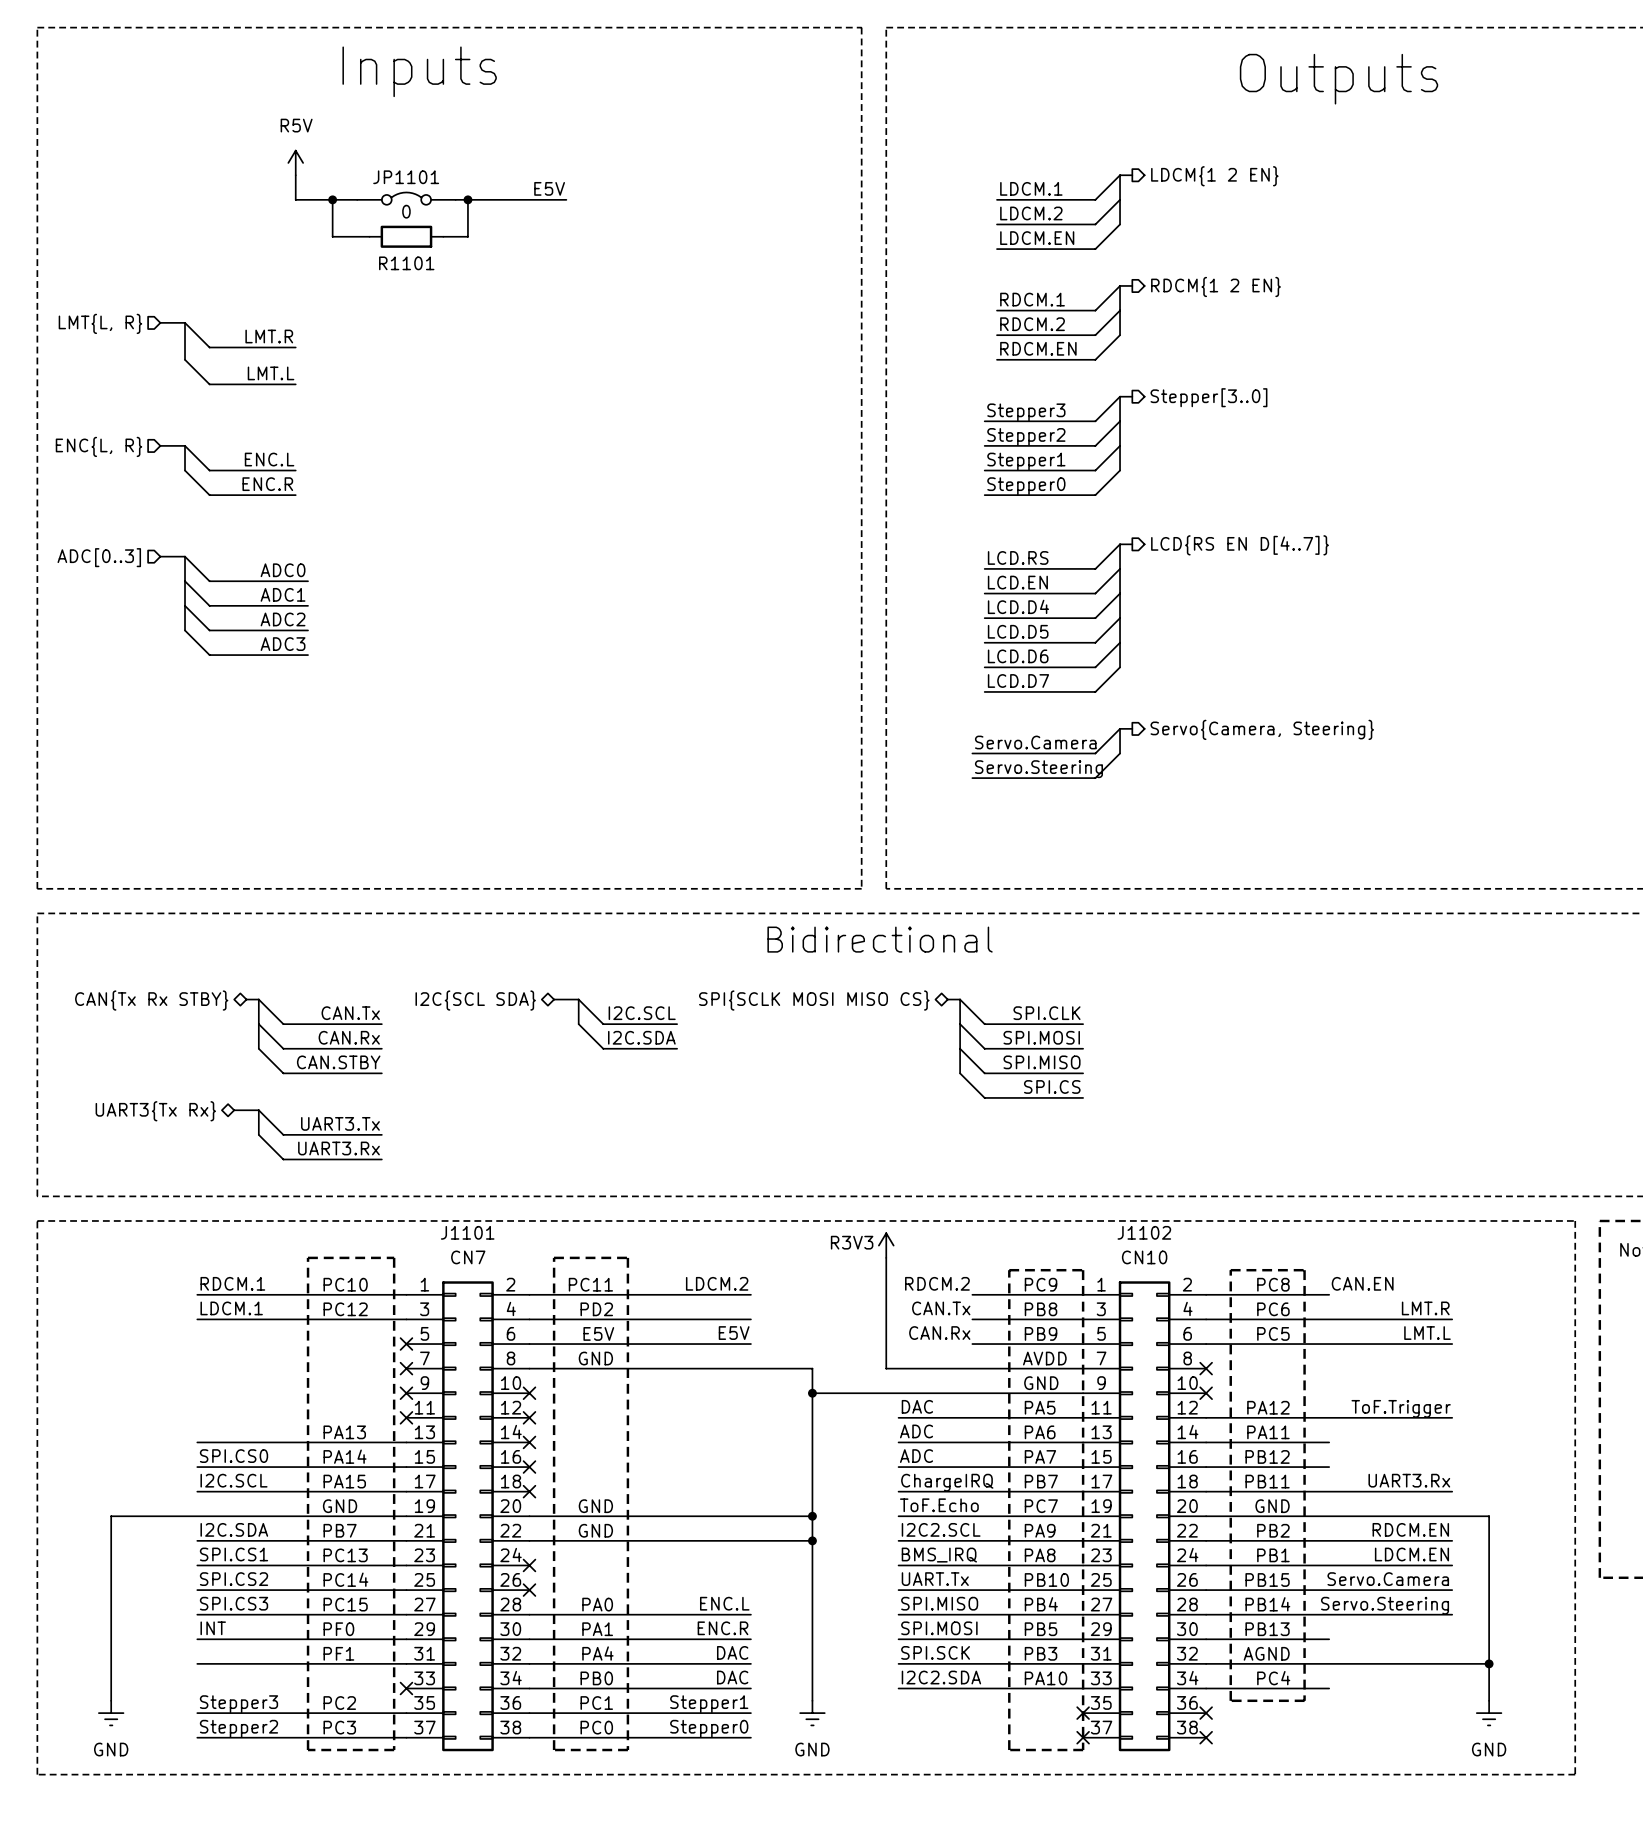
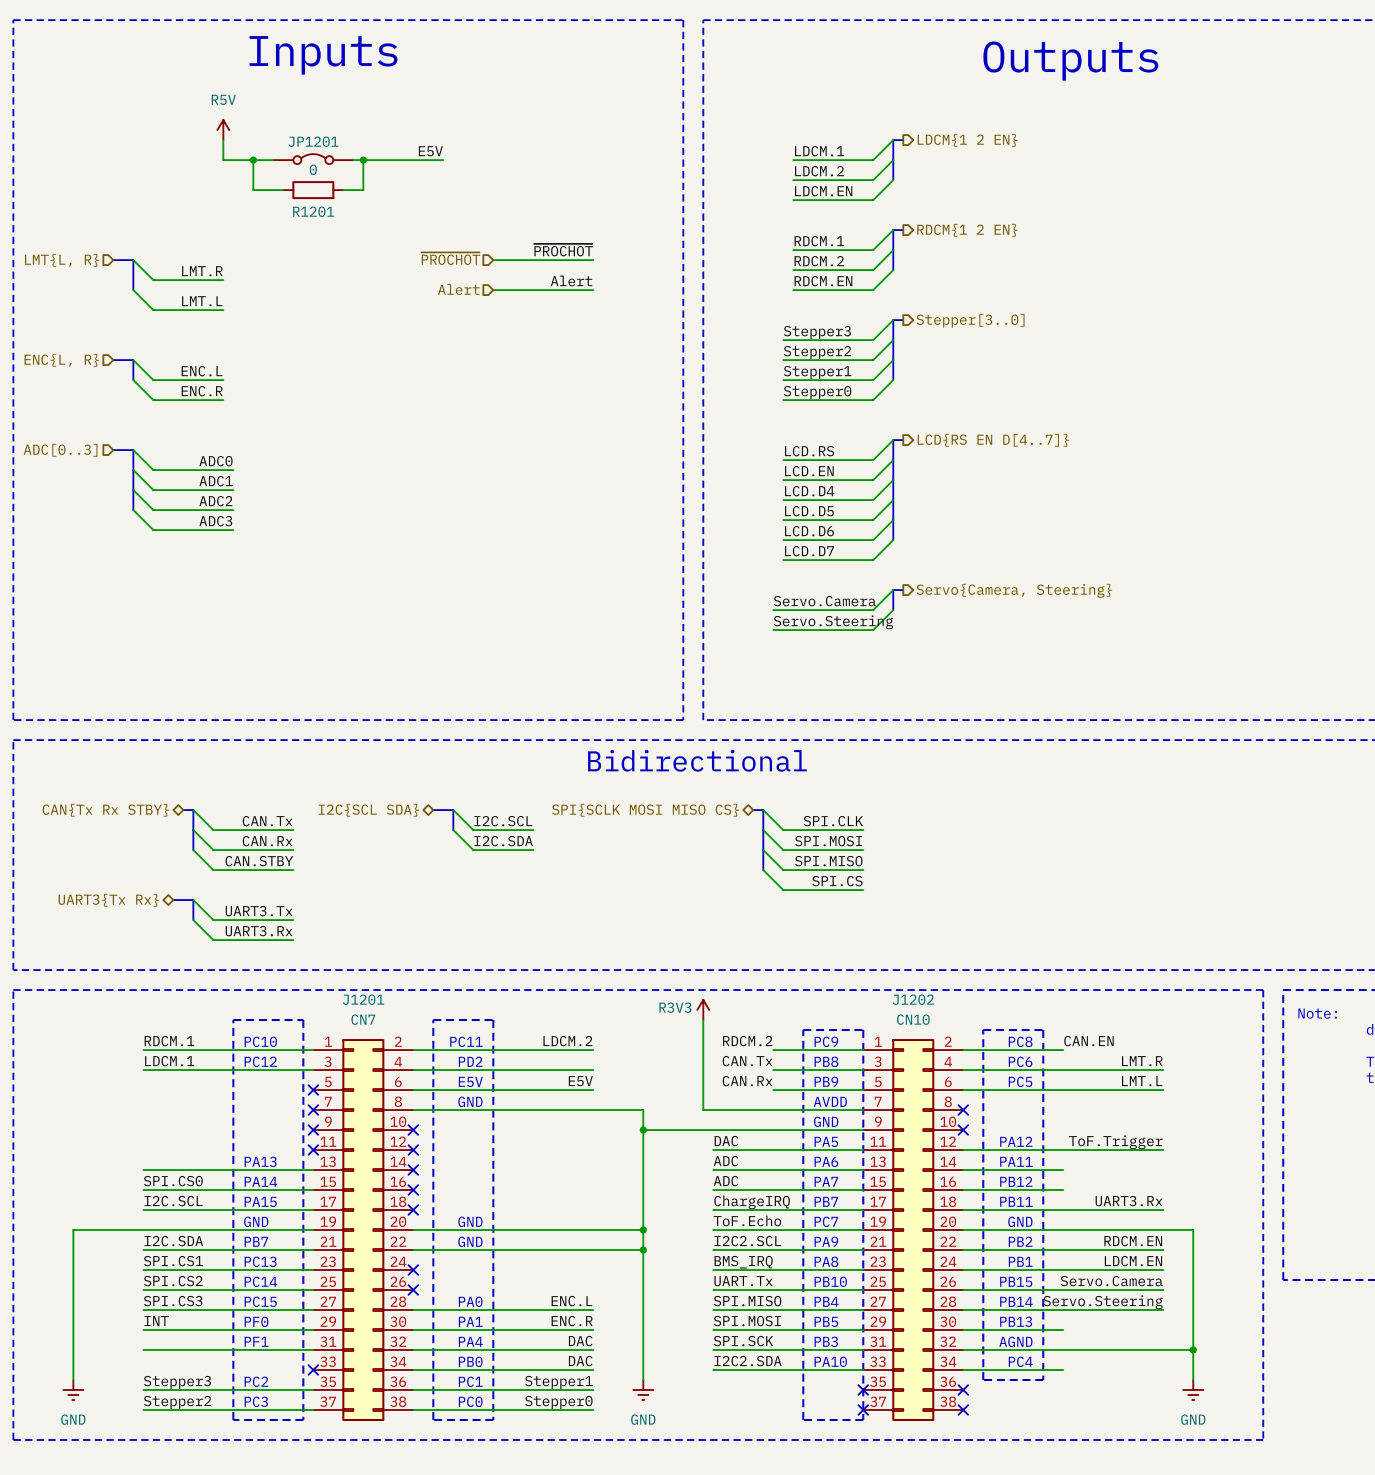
JP1101 name: JP1101 (406, 177) -> JP1201 (313, 141)
R1101 name: R1101 (406, 263) -> R1201 (313, 211)
label: none -> ~{PROCHOT} (563, 250)
hierarchical label: none -> ~{PROCHOT} (450, 258)
wire: none -> (493, 260) (593, 260)
label: none -> Alert (571, 280)
hierarchical label: none -> Alert (458, 289)
wire: none -> (493, 290) (593, 290)
J1101 name: J1101 (467, 1232) -> J1201 (363, 999)
J1102 name: J1102 (1144, 1232) -> J1202 (913, 999)

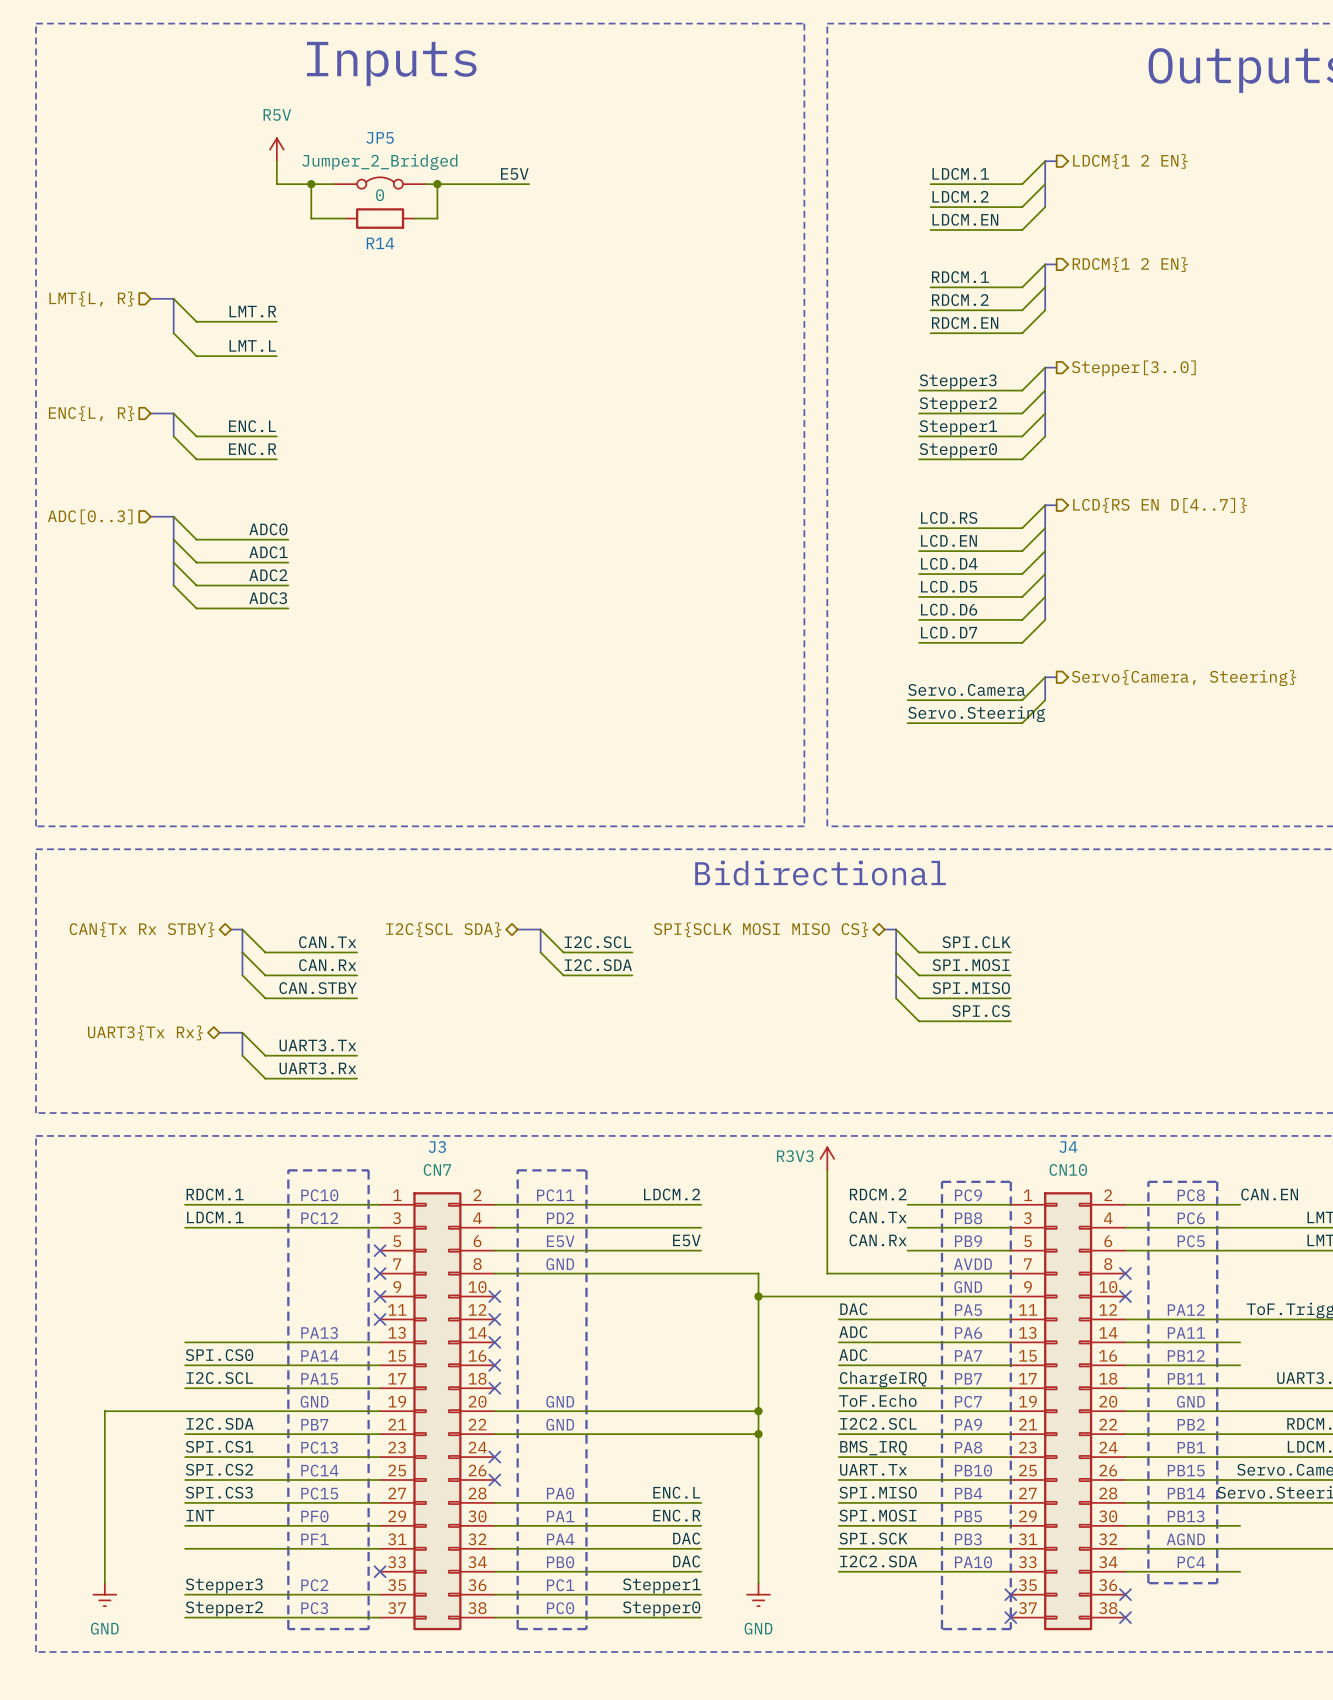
JP1201 value: none -> Jumper_2_Bridged (379, 162)
JP1201 name: JP1201 (313, 141) -> JP5 (380, 137)
R1201 name: R1201 (313, 211) -> R14 (380, 243)
label: ~{PROCHOT} (563, 250) -> none
hierarchical label: ~{PROCHOT} (450, 258) -> none
wire: (493, 260) (593, 260) -> none
label: Alert (571, 280) -> none
hierarchical label: Alert (458, 289) -> none
wire: (493, 290) (593, 290) -> none
J1201 name: J1201 (363, 999) -> J3 (437, 1147)
J1202 name: J1202 (913, 999) -> J4 (1068, 1147)

